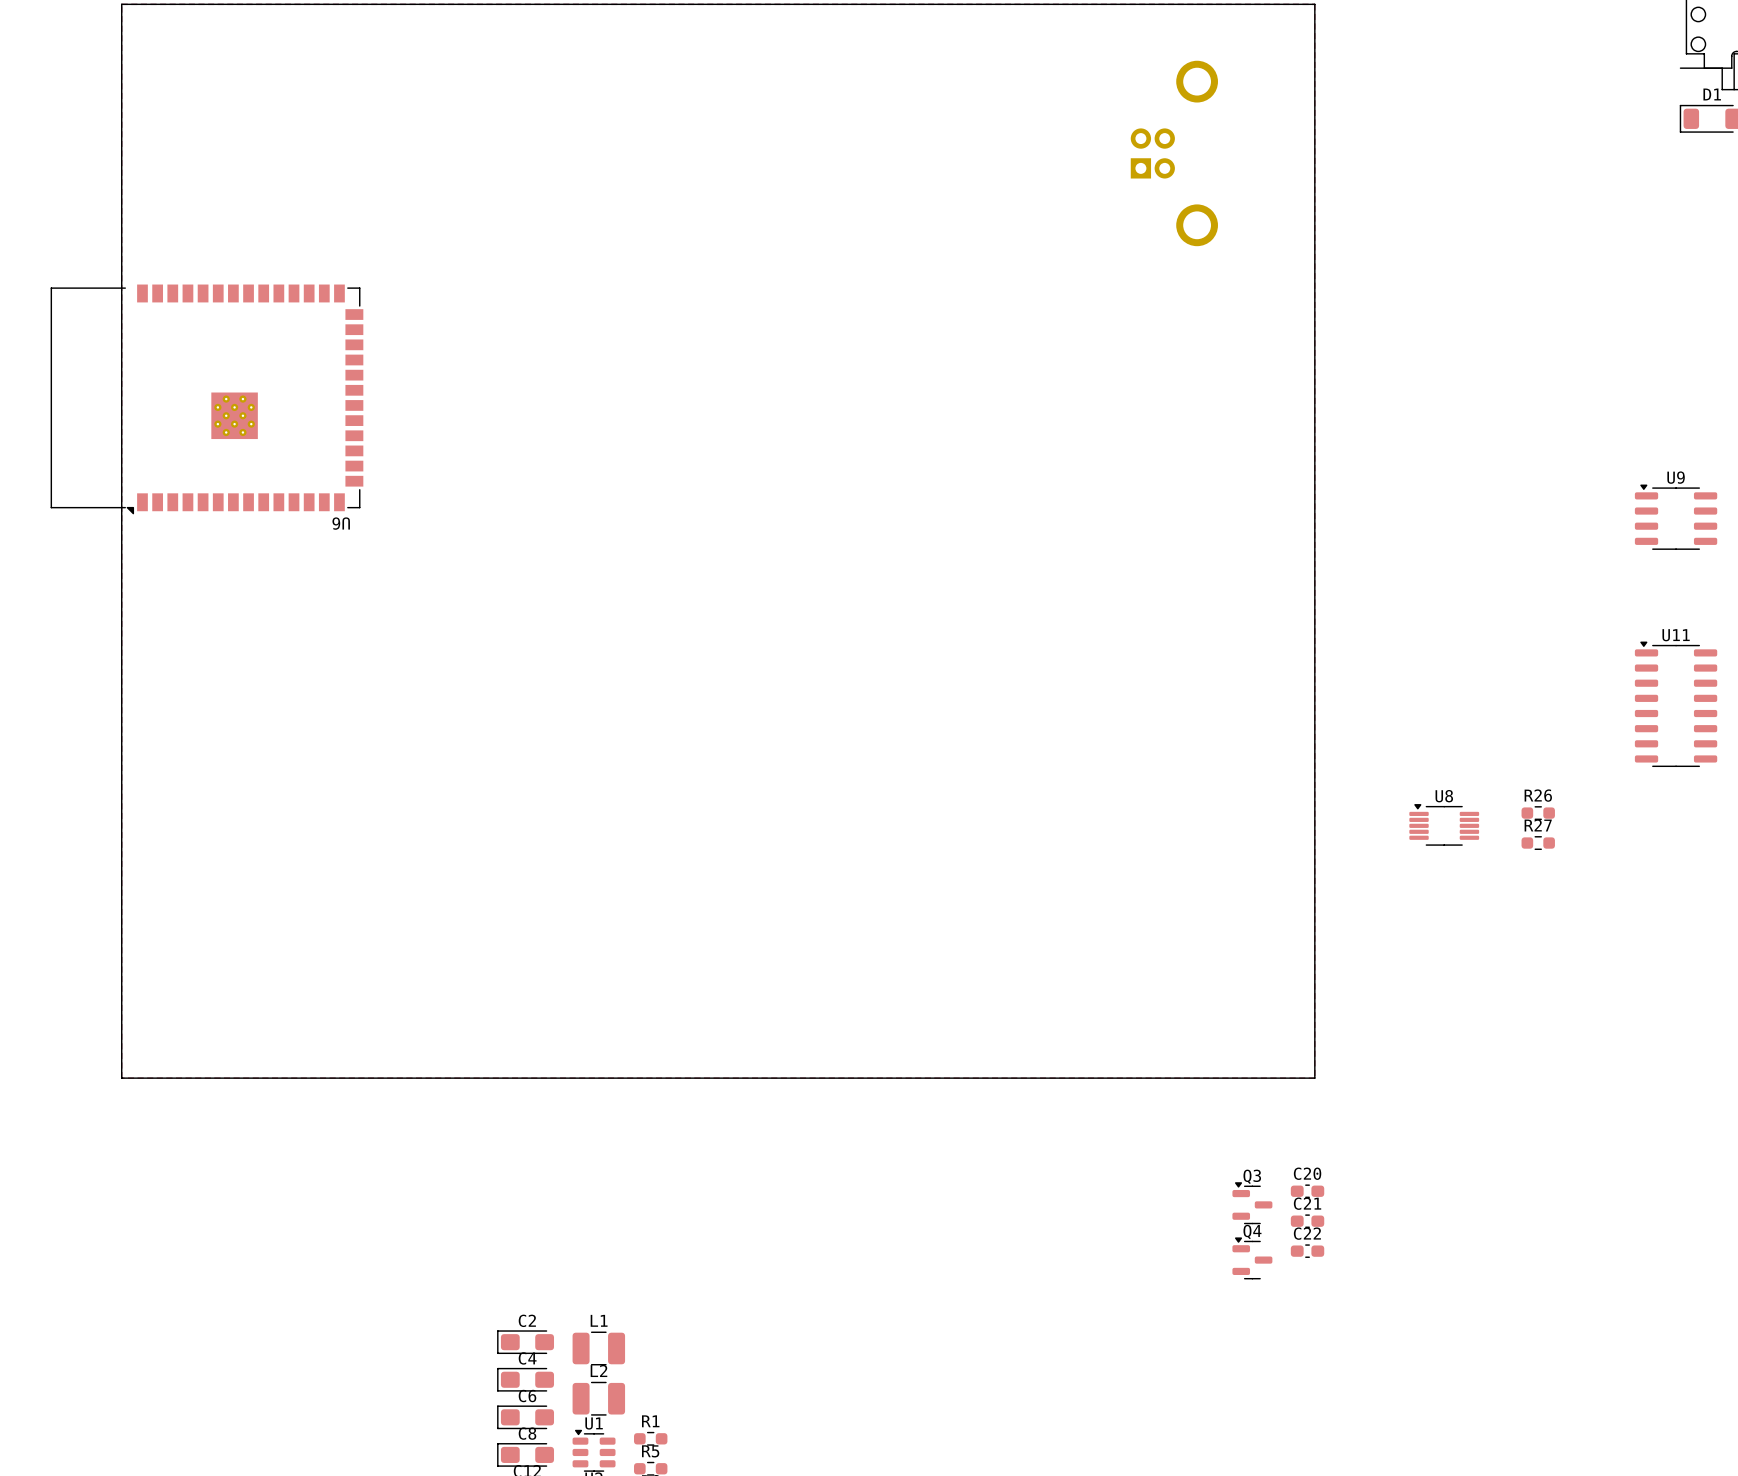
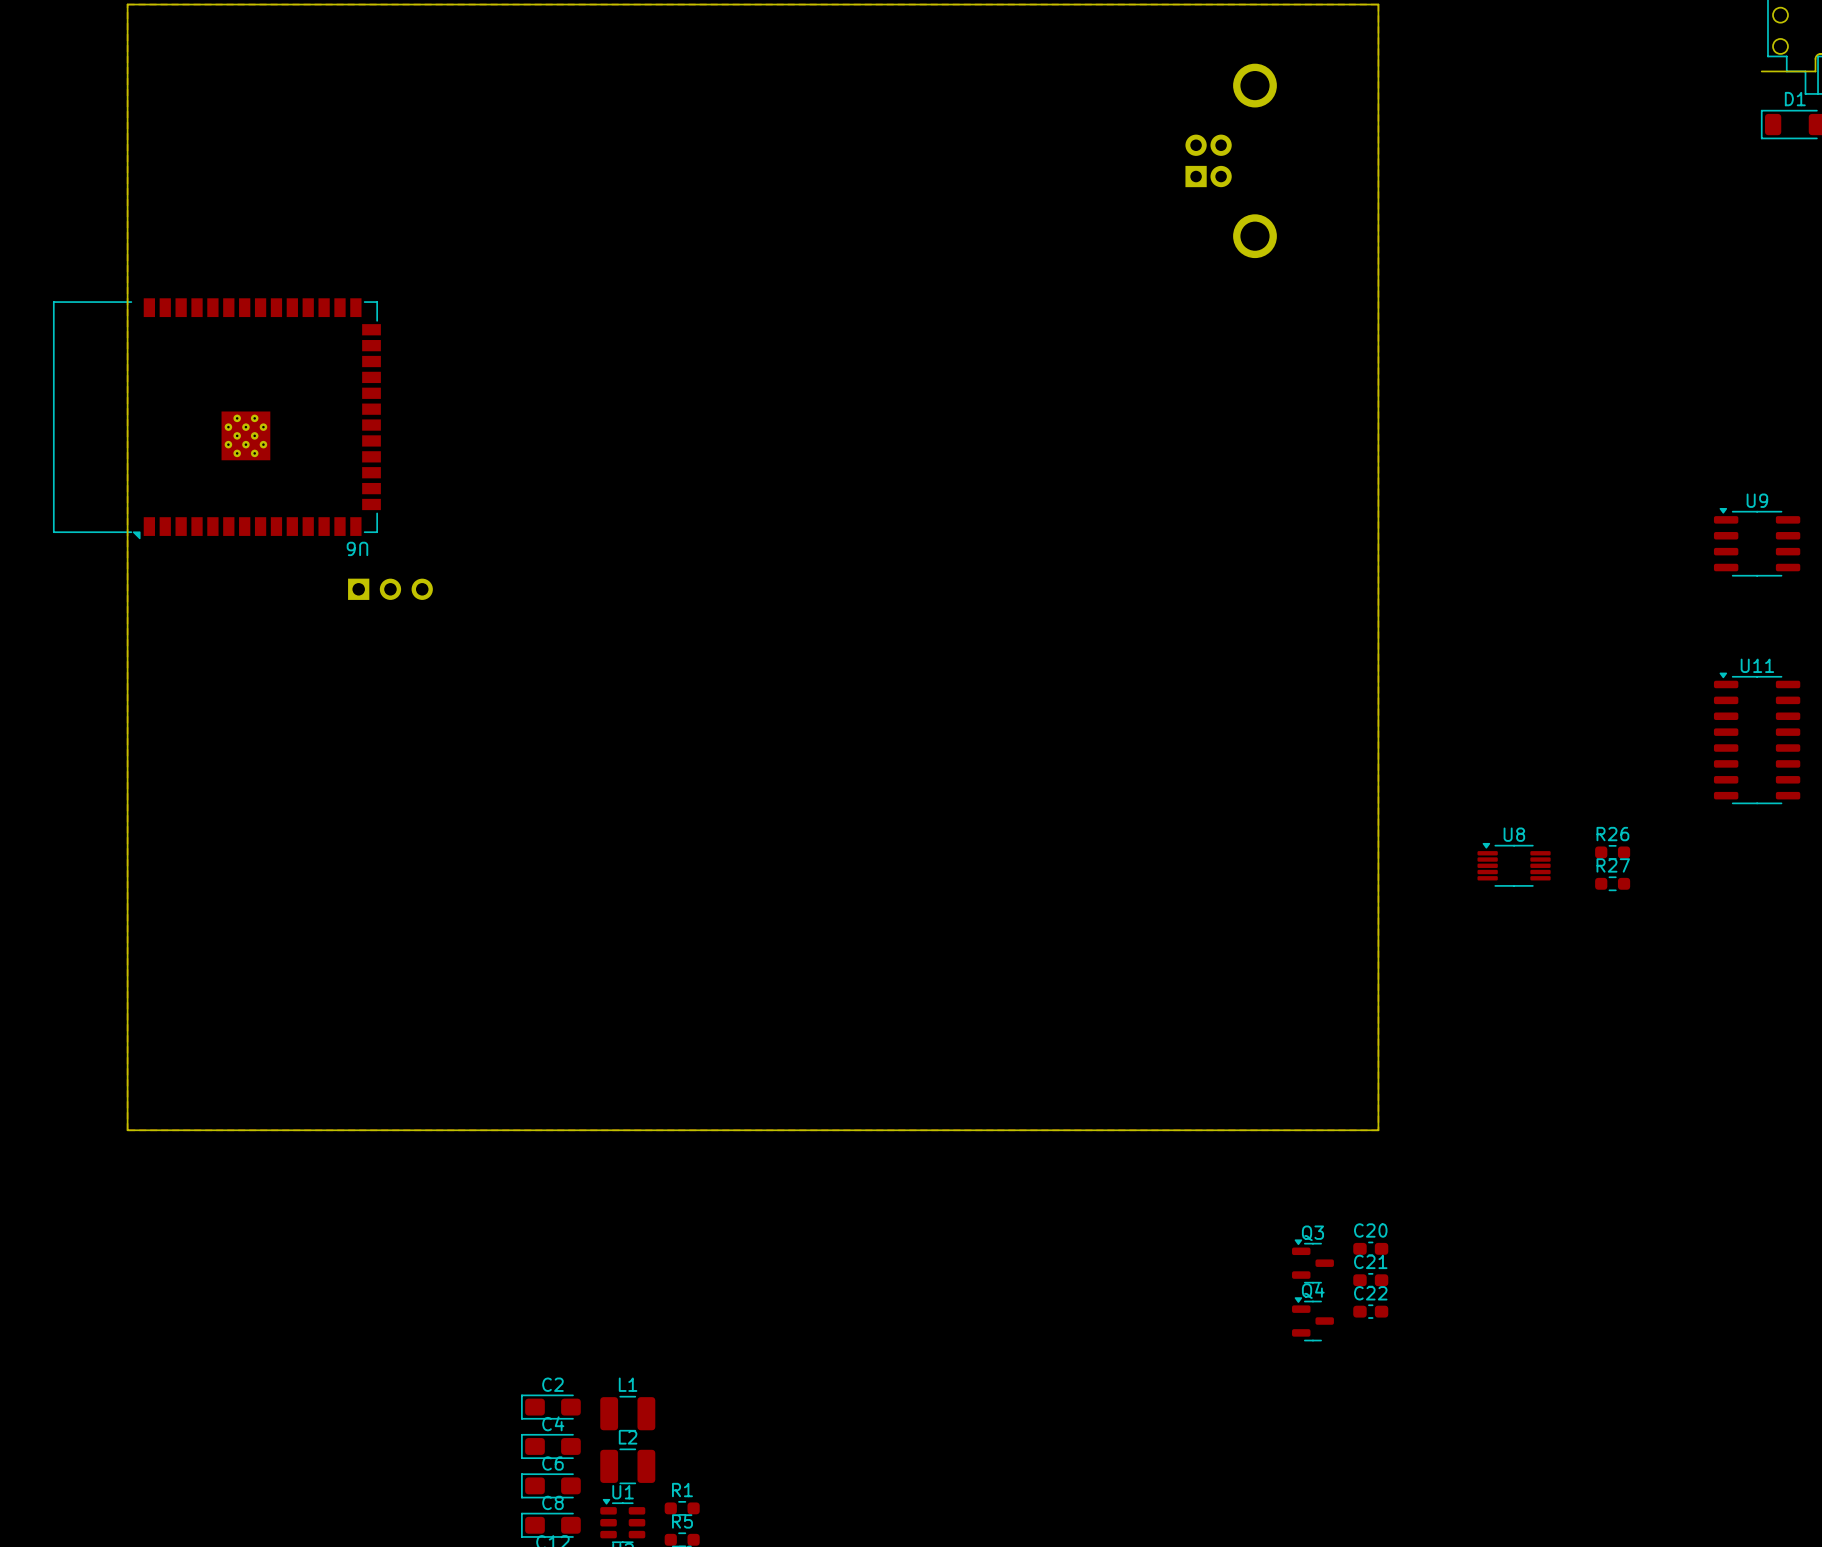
part: none -> (390, 589)

